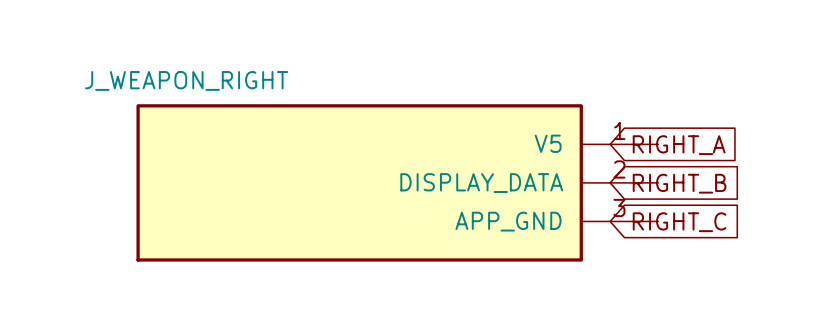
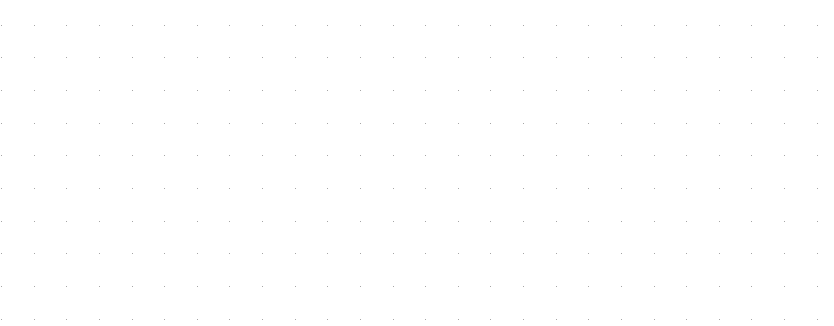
global label: RIGHT_A (679, 145) -> none
J_WEAPON_RIGHT: (397, 182) -> none
global label: RIGHT_B (679, 183) -> none
global label: RIGHT_C (679, 222) -> none

